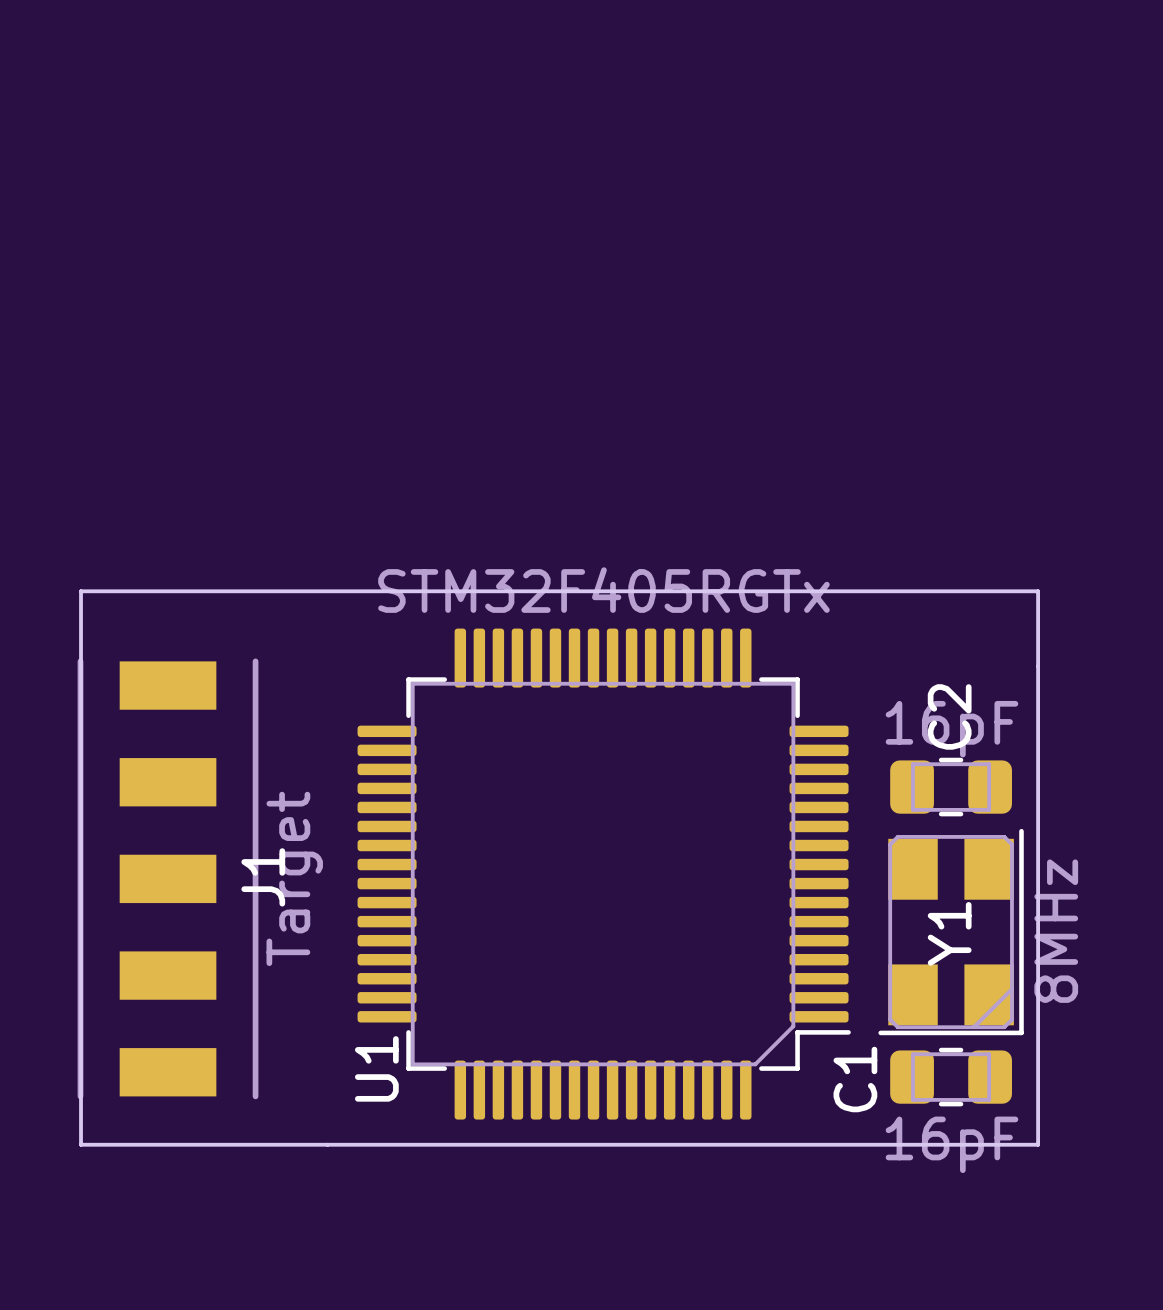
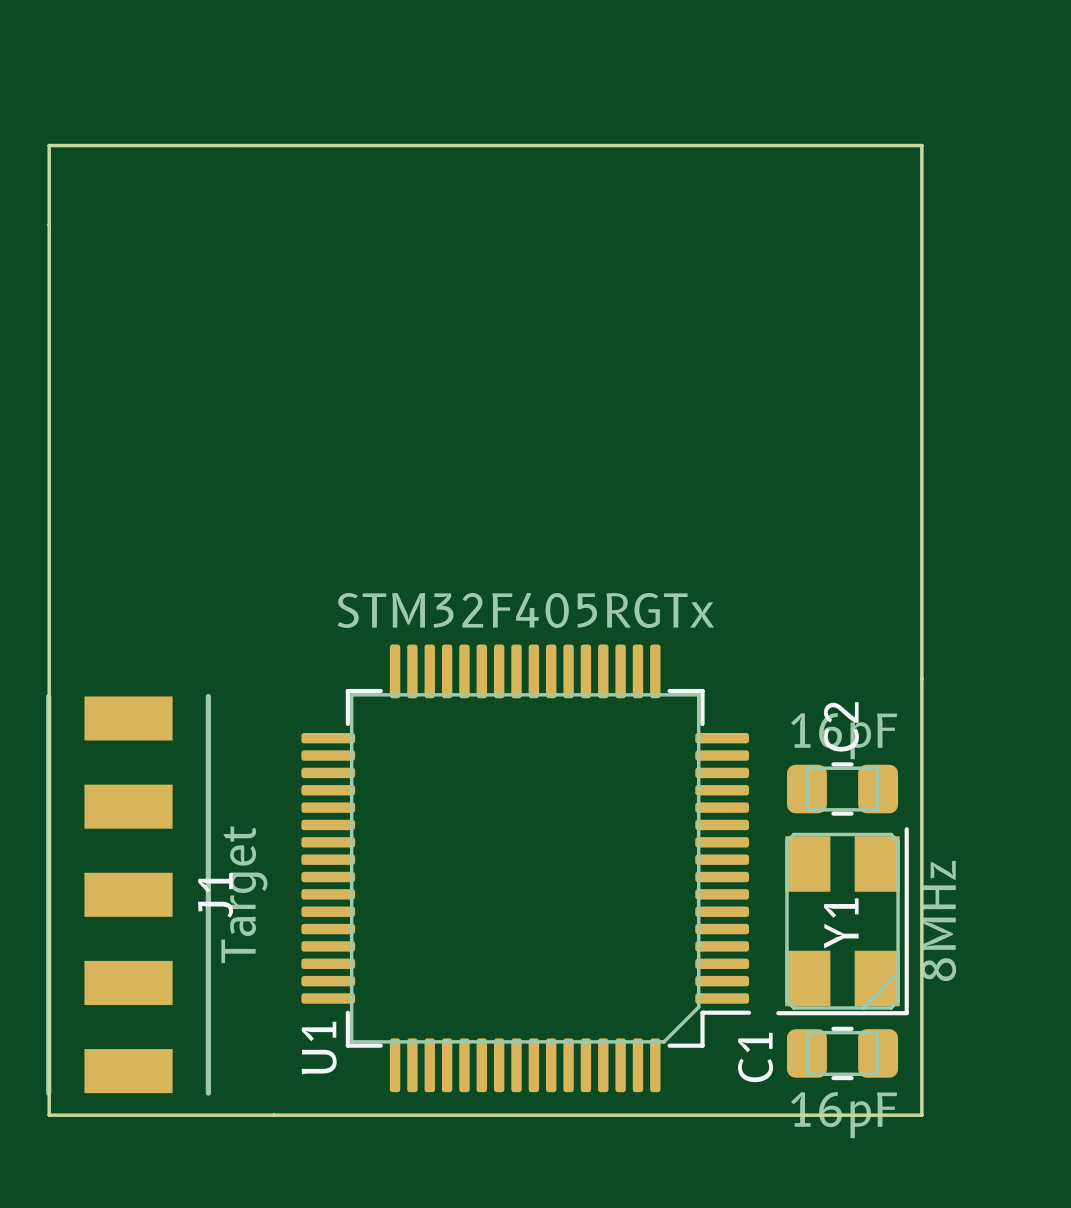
board edge: (81, 591) (1038, 591) -> (49, 610) (49, 145) (921, 145) (921, 610)
J1 position: (168, 878) -> (128, 894)

